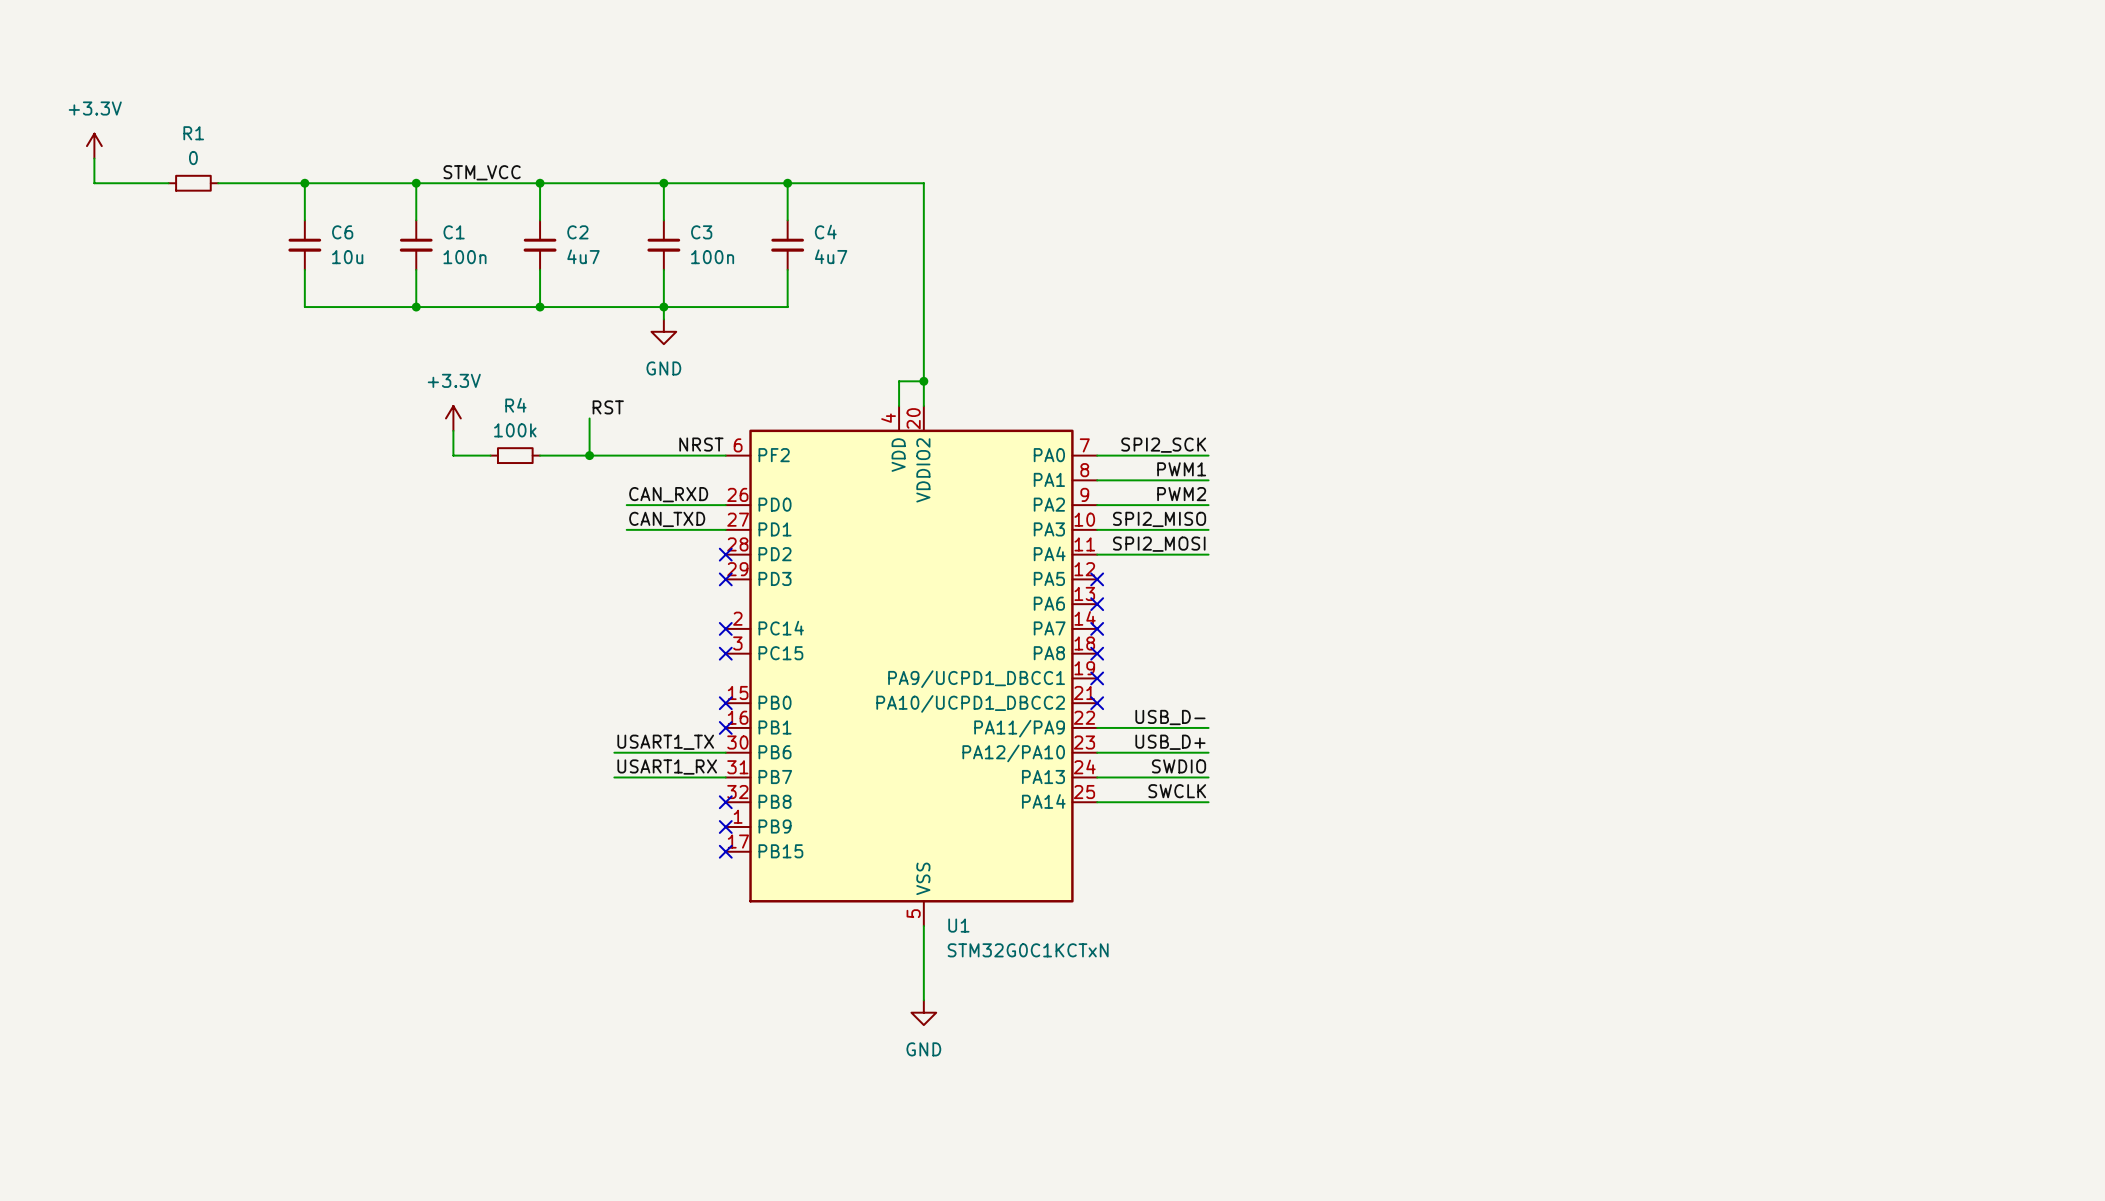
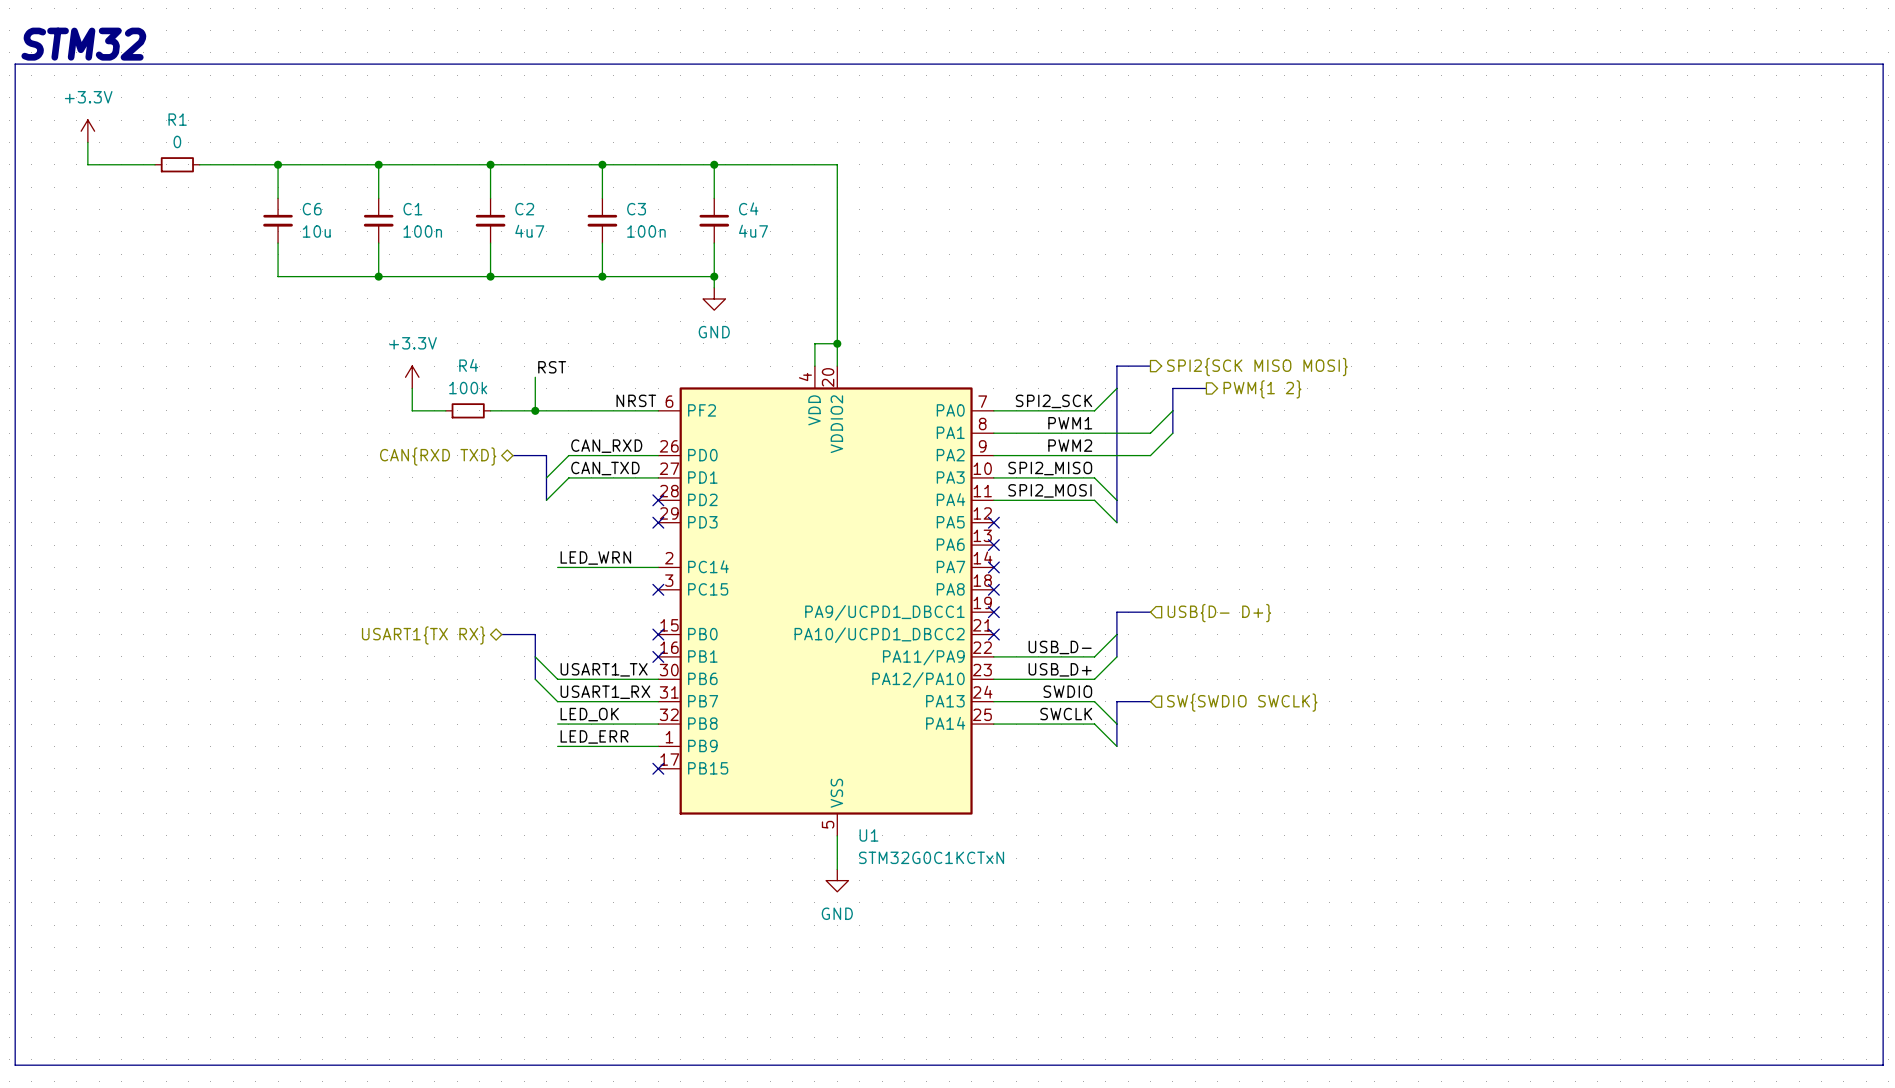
text: none -> STM32 (83, 44)
line: none -> (15, 64) (1883, 64) (1883, 1065) (15, 1065) (15, 64)
label: STM_VCC (482, 172) -> none
wire: (663, 307) (663, 319) -> (714, 276) (714, 287)
junction: none -> (714, 276)
power symbol position: GND (663, 331) -> GND (714, 298)
bus: none -> (1150, 366) (1116, 366) (1116, 522)
hierarchical label: none -> SPI2{SCK MISO MOSI} (1257, 367)
wire: none -> (1116, 388) (1094, 410)
bus: none -> (1206, 388) (1172, 388) (1172, 433)
hierarchical label: none -> PWM{1 2} (1262, 389)
wire: none -> (1172, 410) (1150, 433) (1094, 433)
wire: none -> (1172, 433) (1150, 455) (1094, 455)
bus: none -> (512, 455) (546, 455) (546, 500)
wire: none -> (568, 455) (546, 477)
hierarchical label: none -> CAN{RXD TXD} (438, 456)
wire: none -> (568, 477) (546, 500)
wire: none -> (1094, 477) (1116, 500)
wire: none -> (1094, 500) (1116, 522)
label: none -> LED_WRN (595, 557)
wire: none -> (557, 567) (658, 567)
no-connect mark: (725, 628) -> none
bus: none -> (1150, 612) (1116, 612) (1116, 656)
hierarchical label: none -> USB{D- D+} (1219, 613)
bus: none -> (501, 634) (535, 634) (535, 679)
wire: none -> (1116, 634) (1094, 656)
hierarchical label: none -> USART1{TX RX} (423, 635)
wire: none -> (535, 656) (557, 679)
wire: none -> (1116, 656) (1094, 679)
wire: none -> (535, 679) (557, 701)
wire: none -> (1094, 701) (1116, 724)
bus: none -> (1150, 701) (1116, 701) (1116, 746)
hierarchical label: none -> SW{SWDIO SWCLK} (1242, 702)
label: none -> LED_OK (589, 714)
wire: none -> (557, 724) (658, 724)
no-connect mark: (725, 802) -> none
wire: none -> (1094, 724) (1116, 746)
label: none -> LED_ERR (594, 736)
wire: none -> (557, 746) (658, 746)
no-connect mark: (725, 826) -> none
wire: (923, 963) (923, 1000) -> none
power symbol position: GND (923, 1012) -> GND (837, 880)

